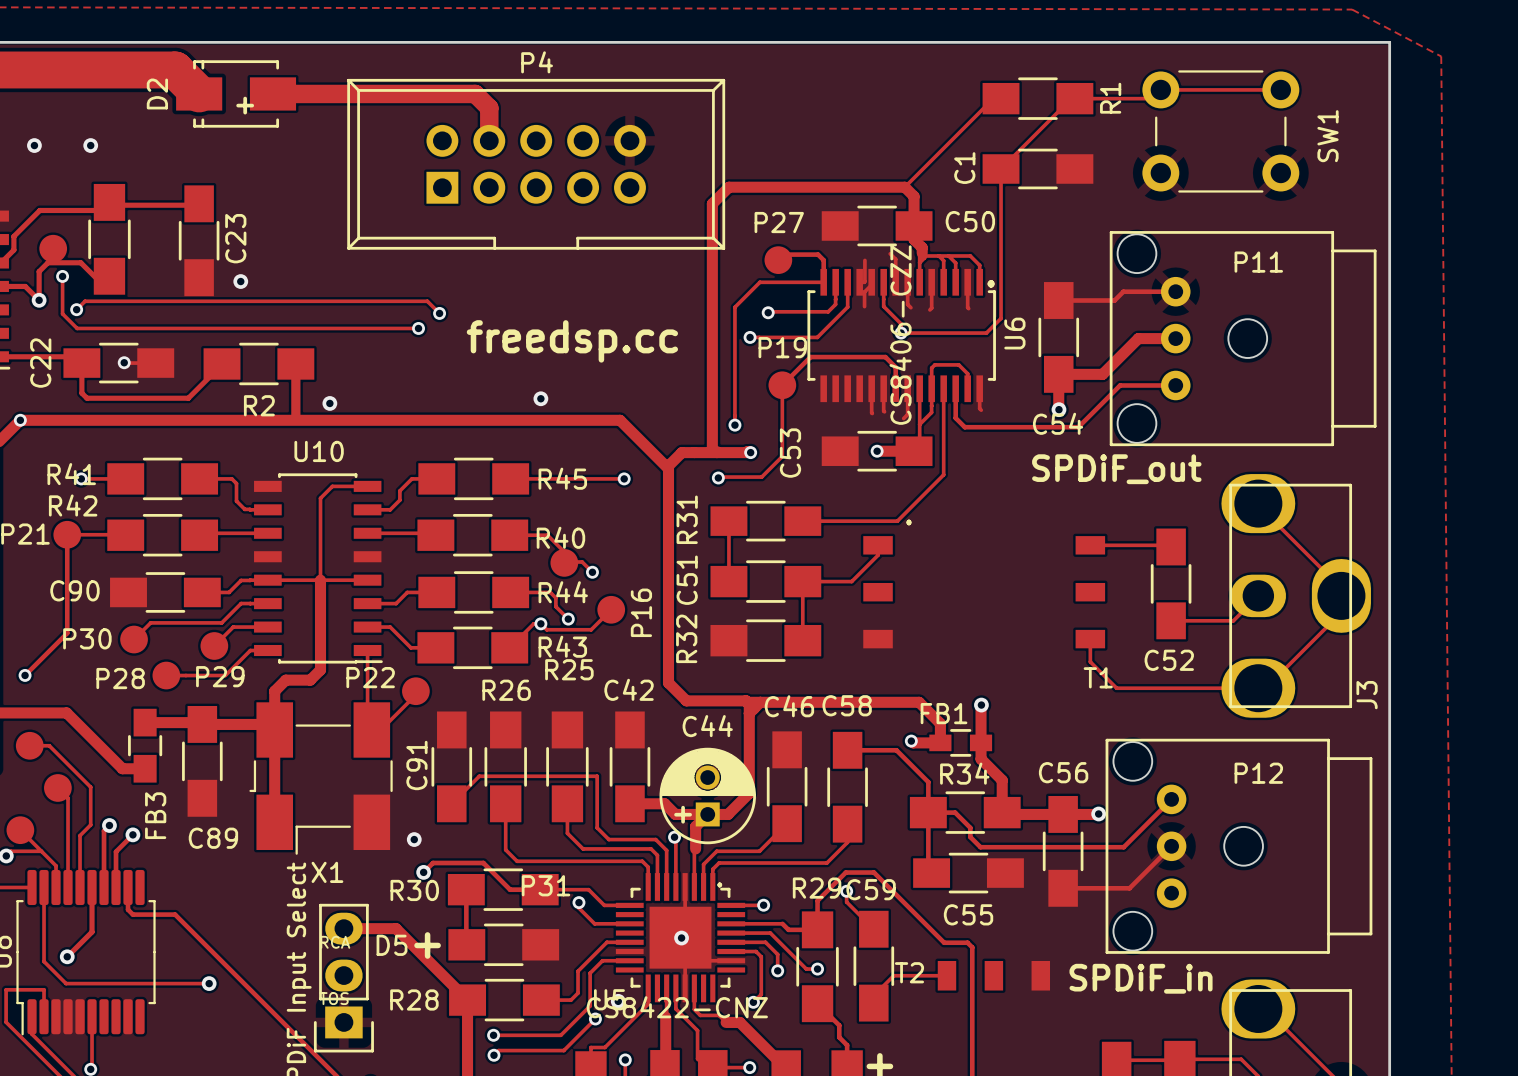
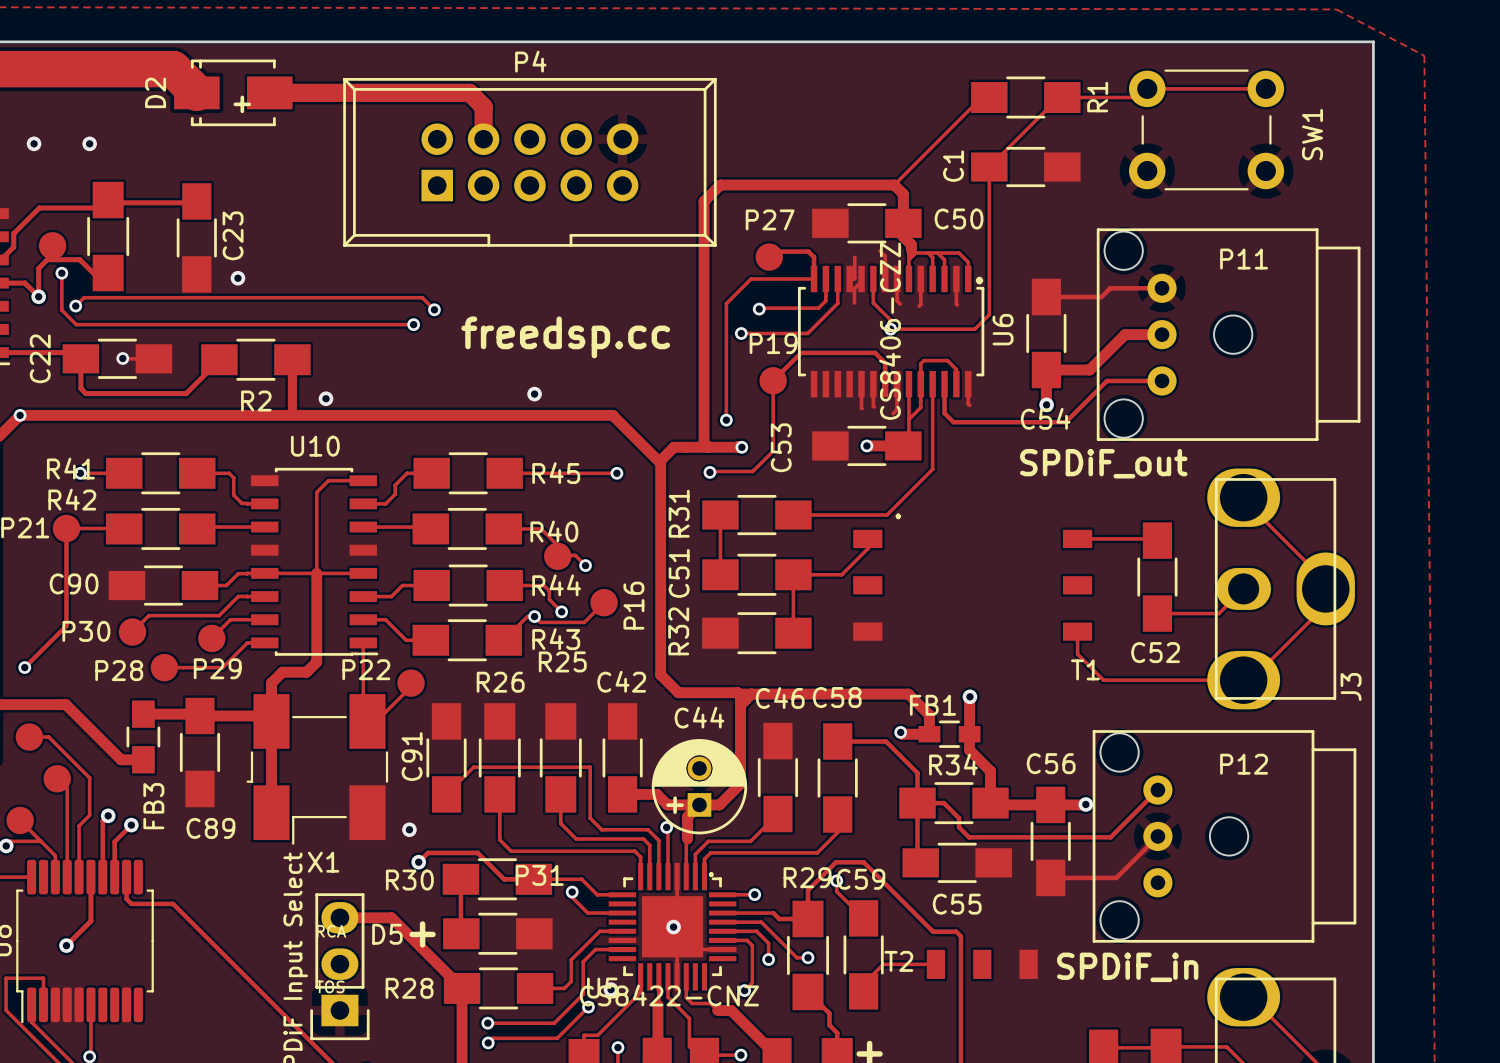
track: (44, 887) (44, 961) (66, 983) (209, 983) -> none
via: (209, 983) -> none

